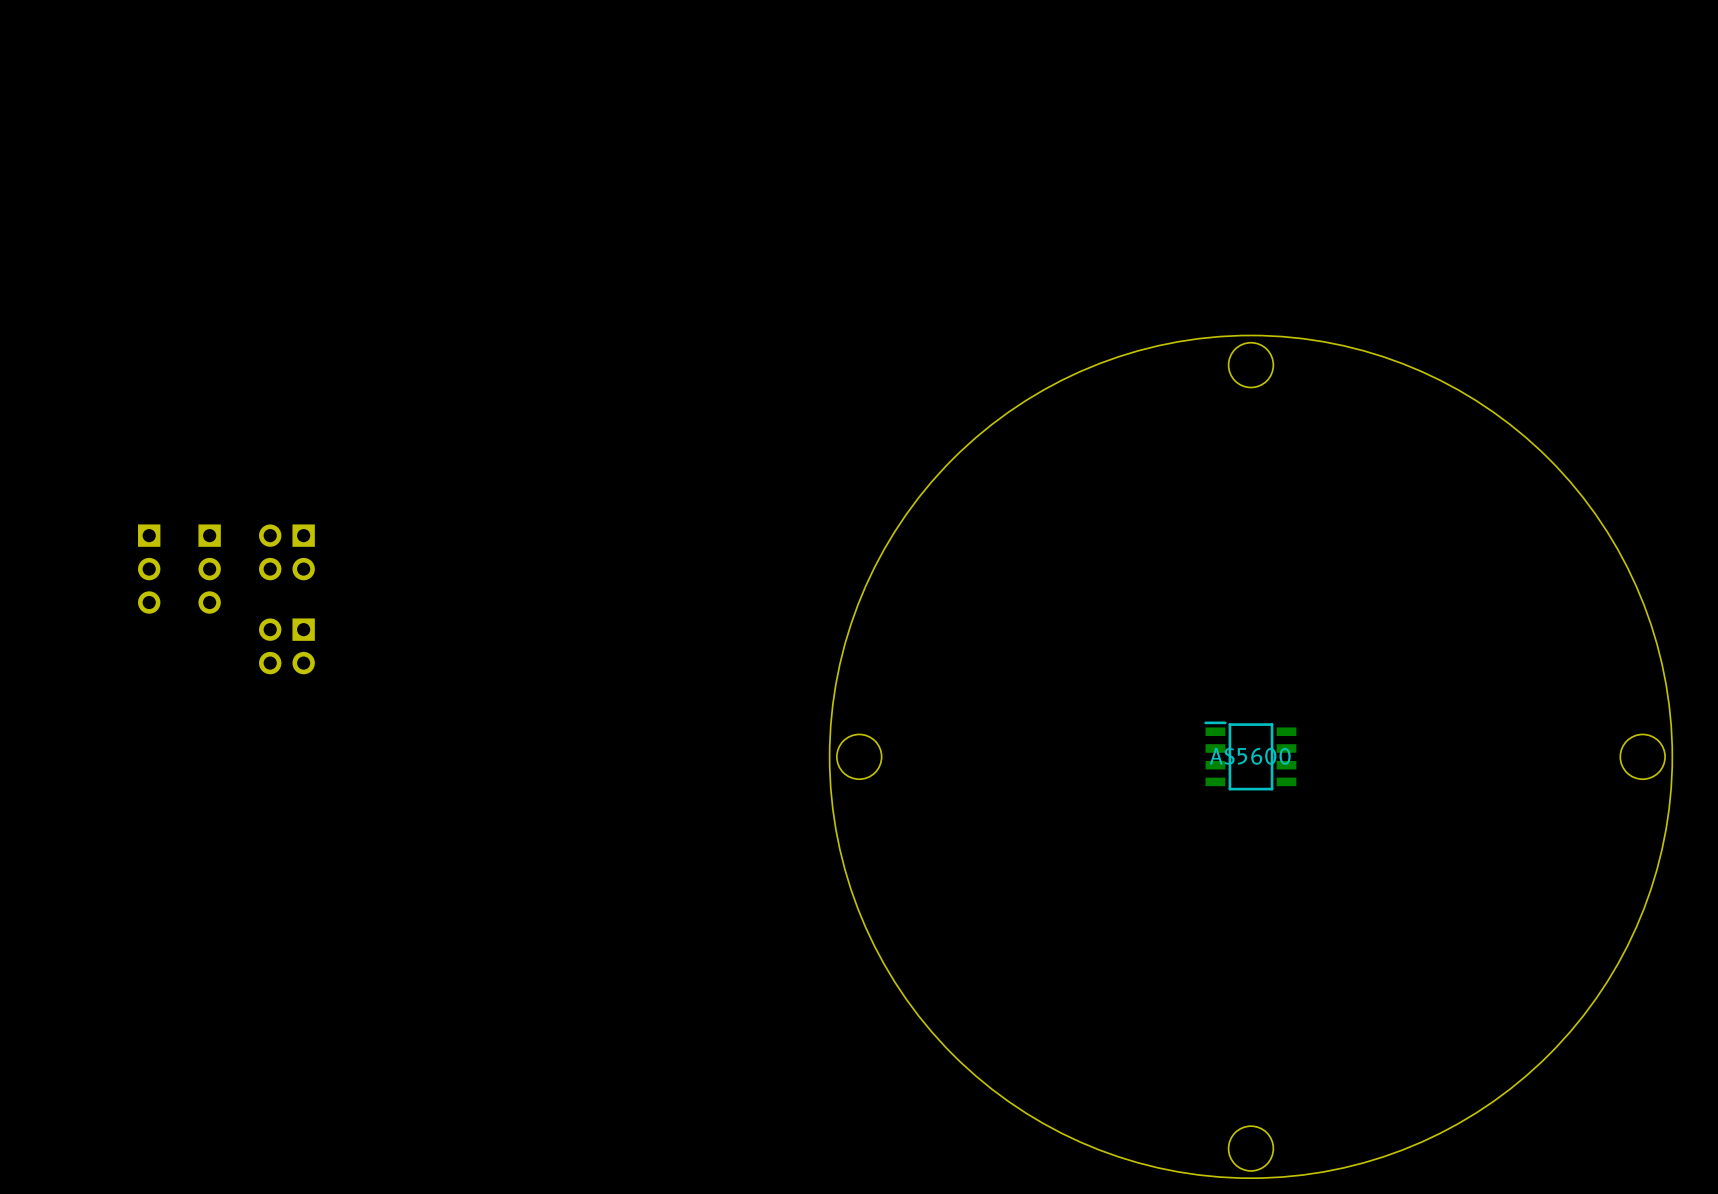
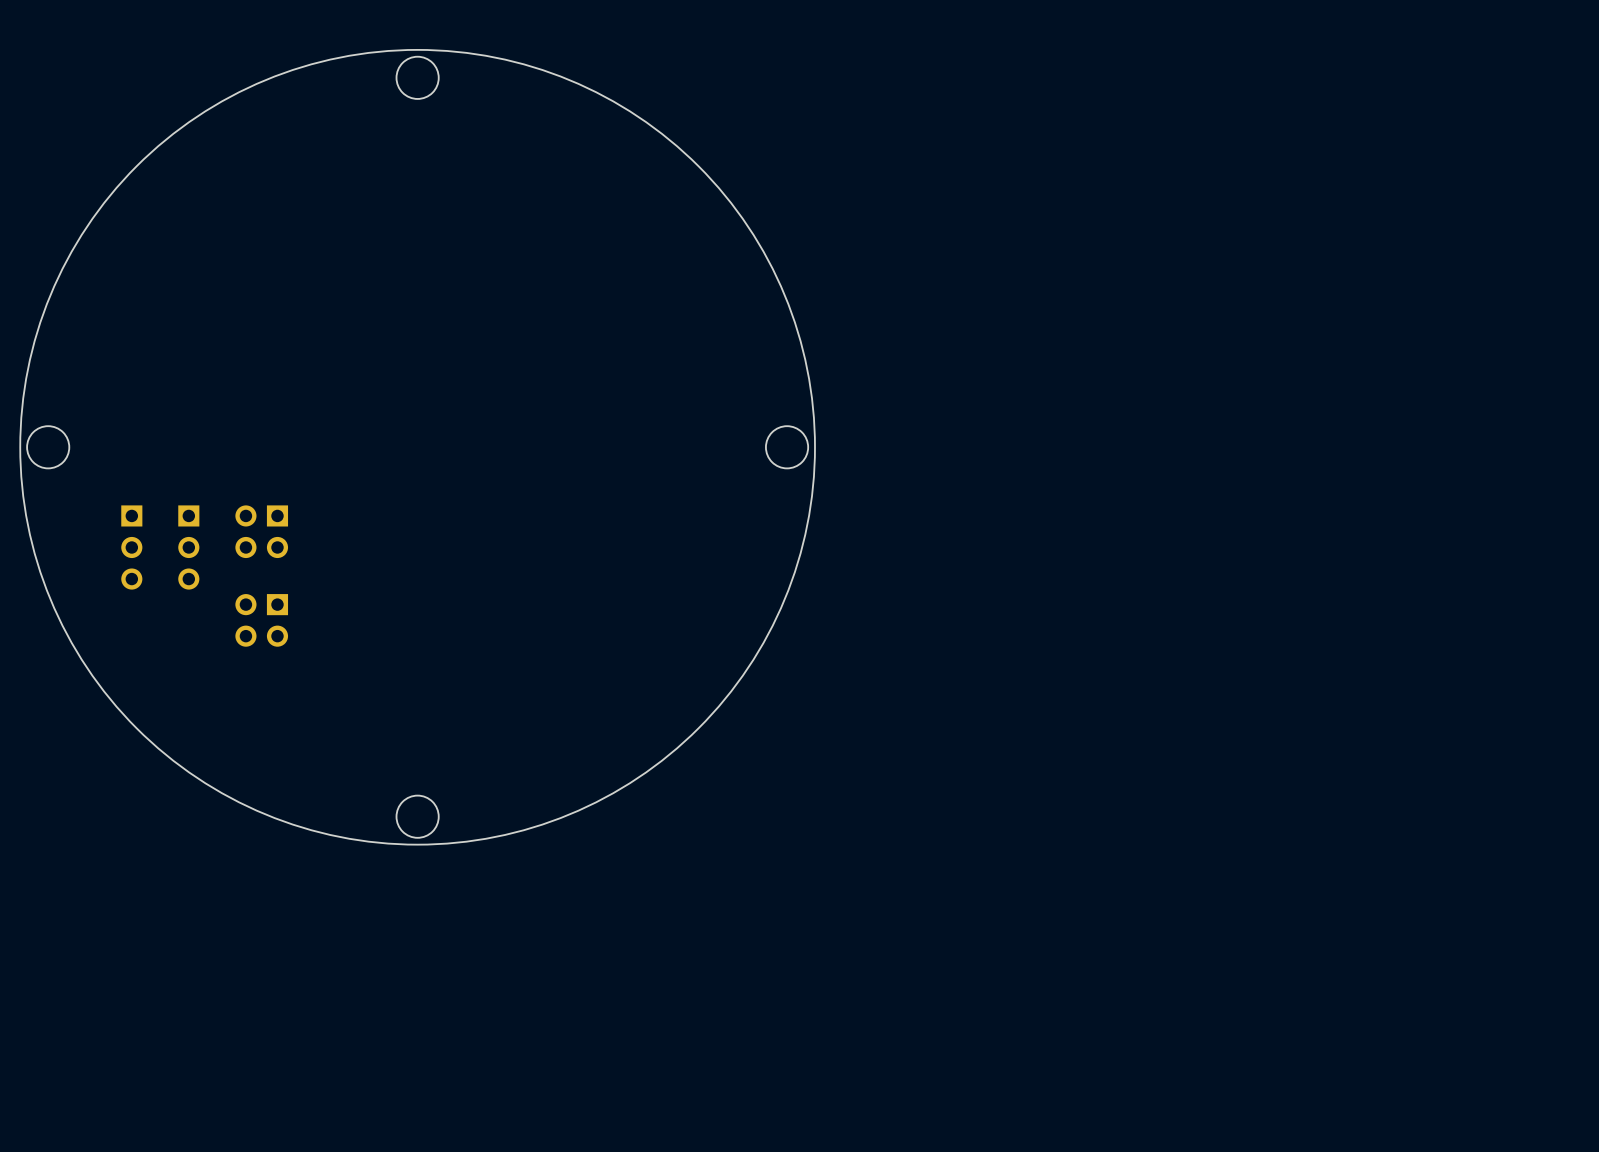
round board edge: none -> [19, 49, 816, 845]
round board edge: none -> [396, 56, 440, 100]
round board edge: [829, 335, 1673, 1179] -> none
round board edge: [1228, 342, 1274, 388] -> none
round board edge: none -> [26, 425, 70, 469]
round board edge: none -> [765, 425, 809, 469]
round board edge: [836, 734, 882, 780] -> none
round board edge: [1619, 734, 1666, 780] -> none
AS5600: (1250, 755) -> none
round board edge: none -> [396, 795, 440, 839]
round board edge: [1228, 1125, 1274, 1172] -> none

